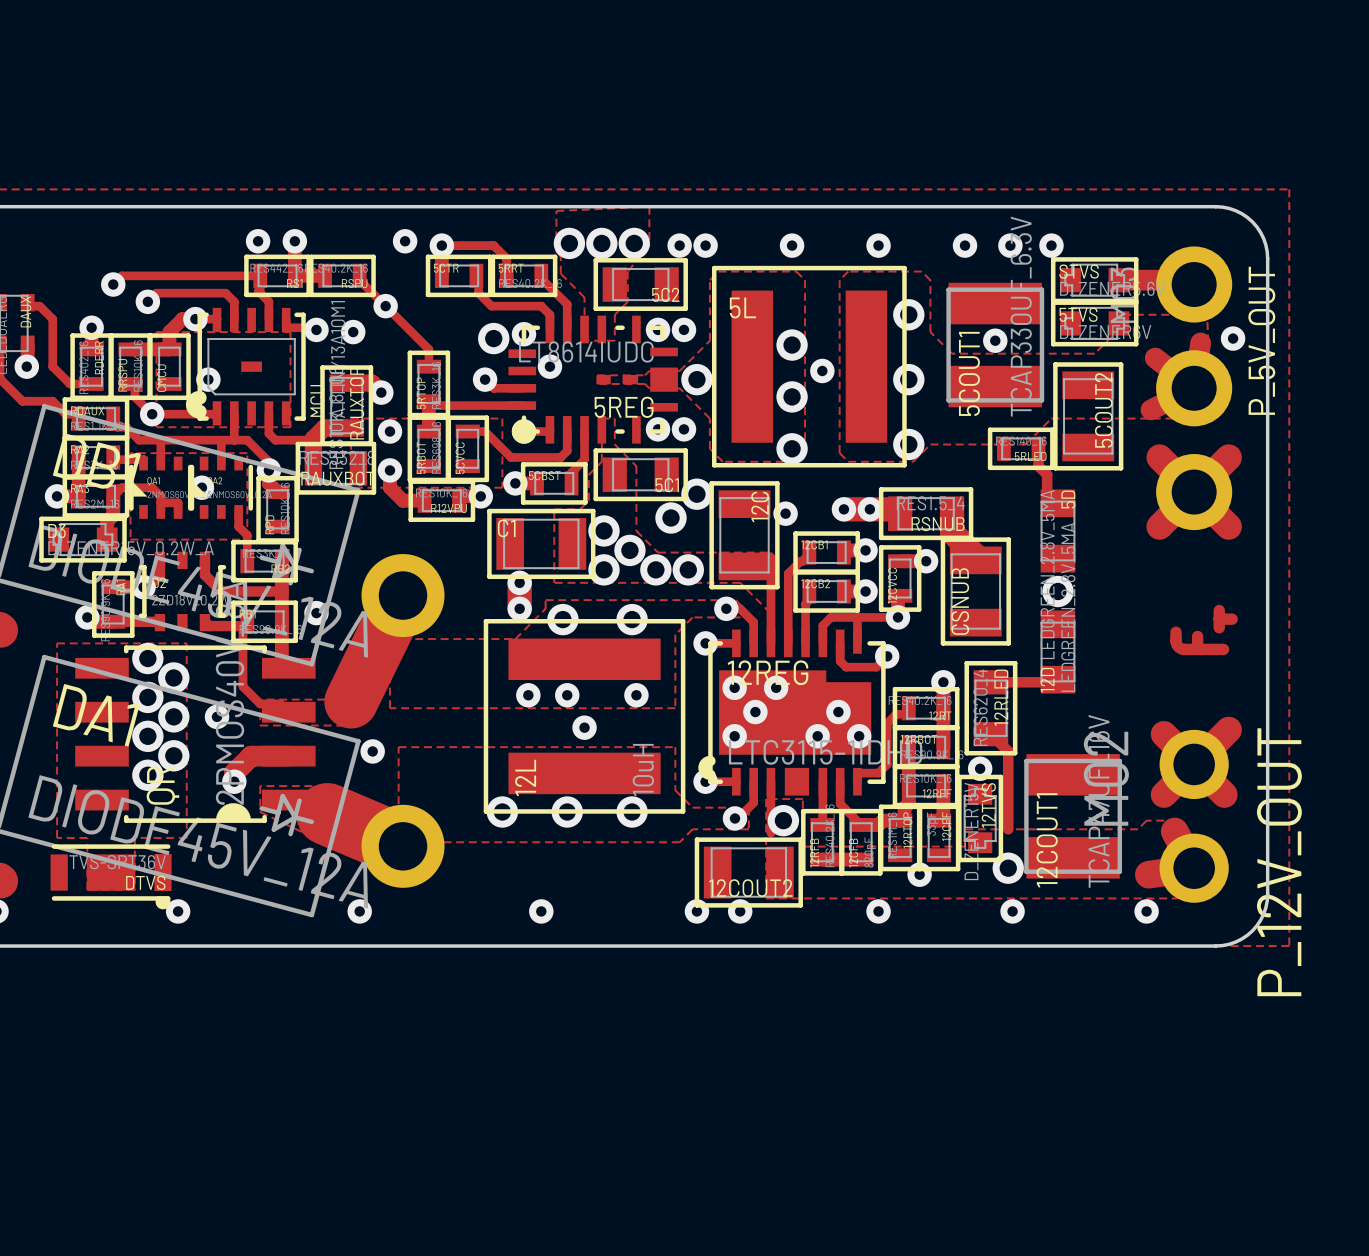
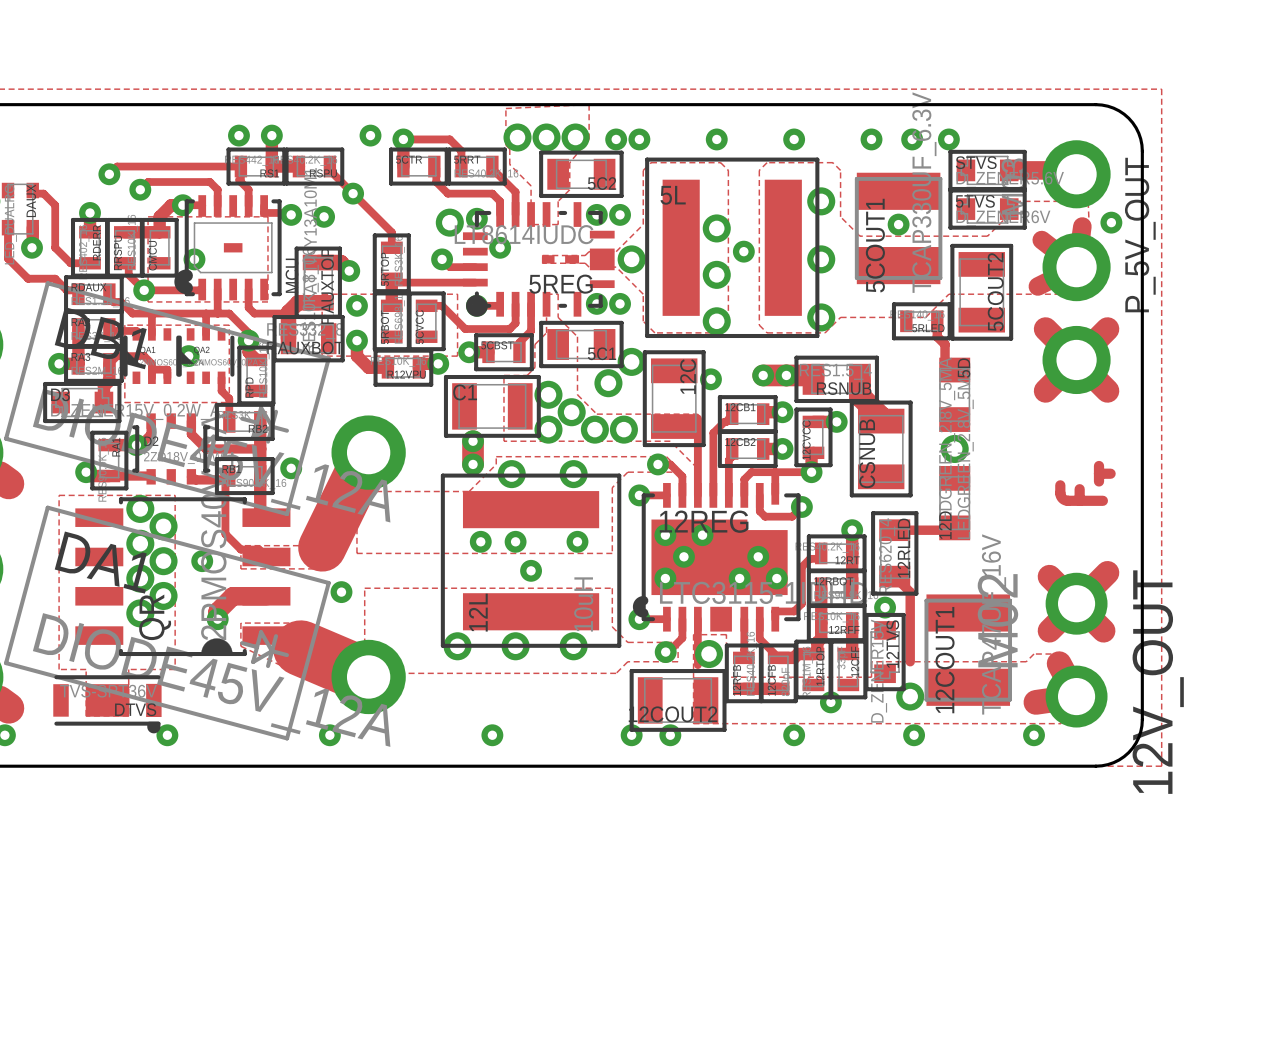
P_12V_OUT name: P_12V_OUT (1279, 862) -> 12V_OUT (1158, 682)

